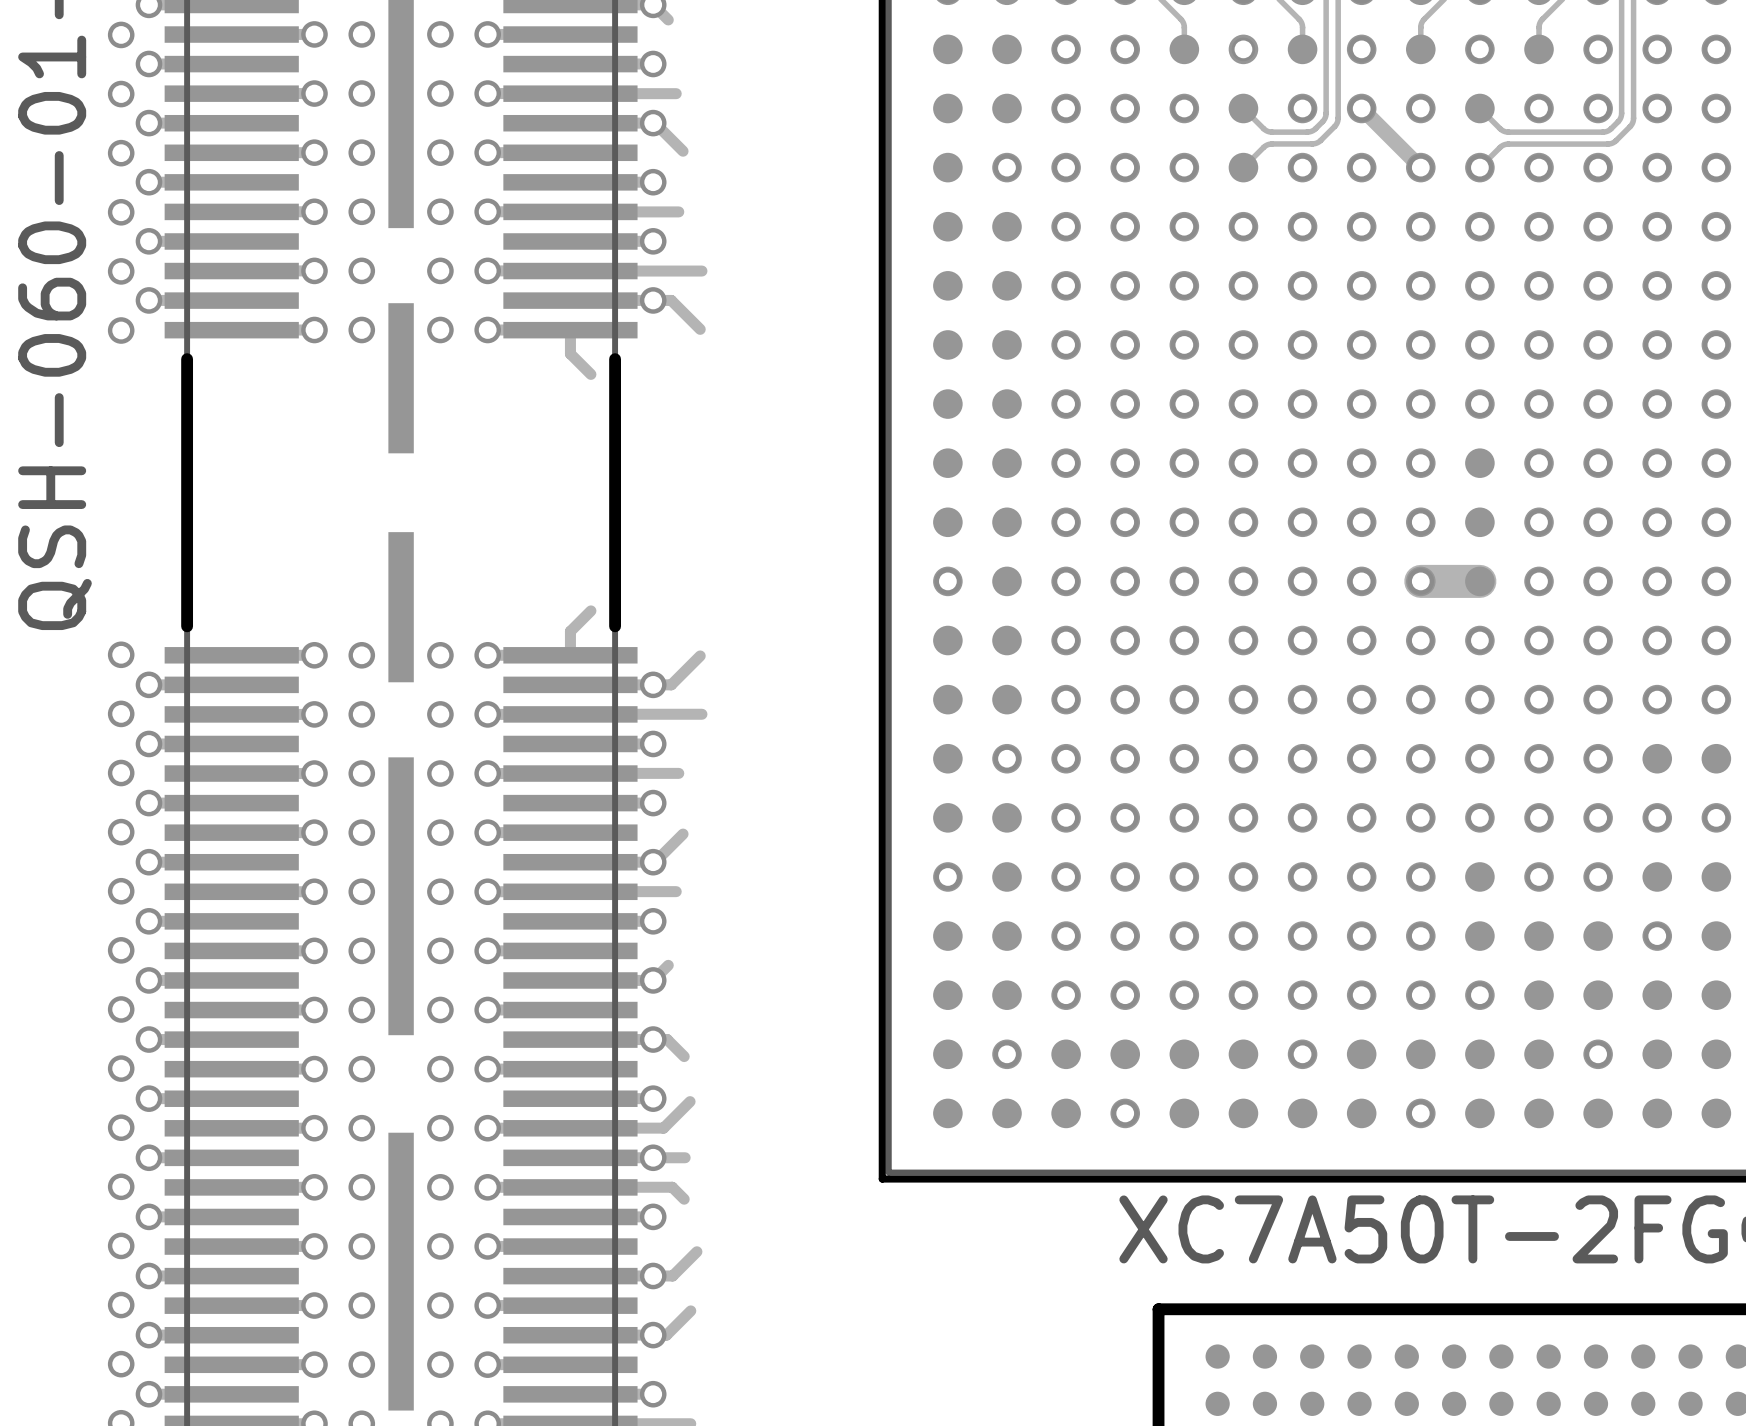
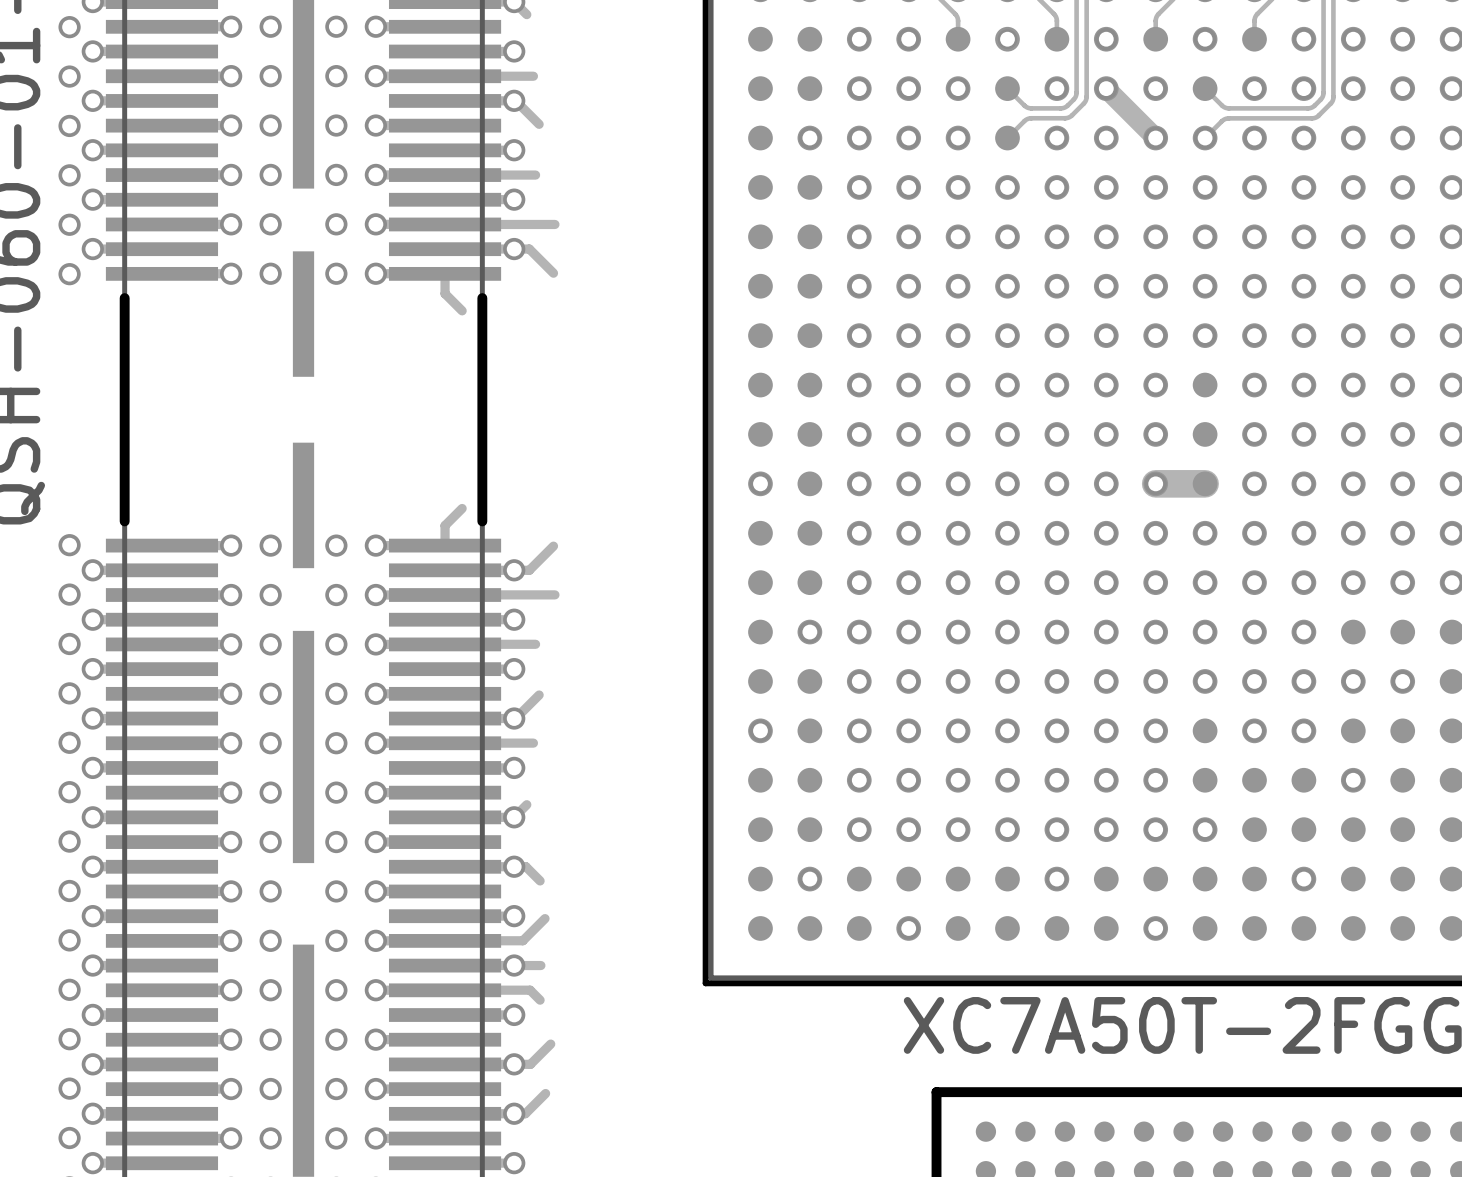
track width: thin (1361, 108) (1420, 167) -> thick (1106, 88) (1155, 138)

